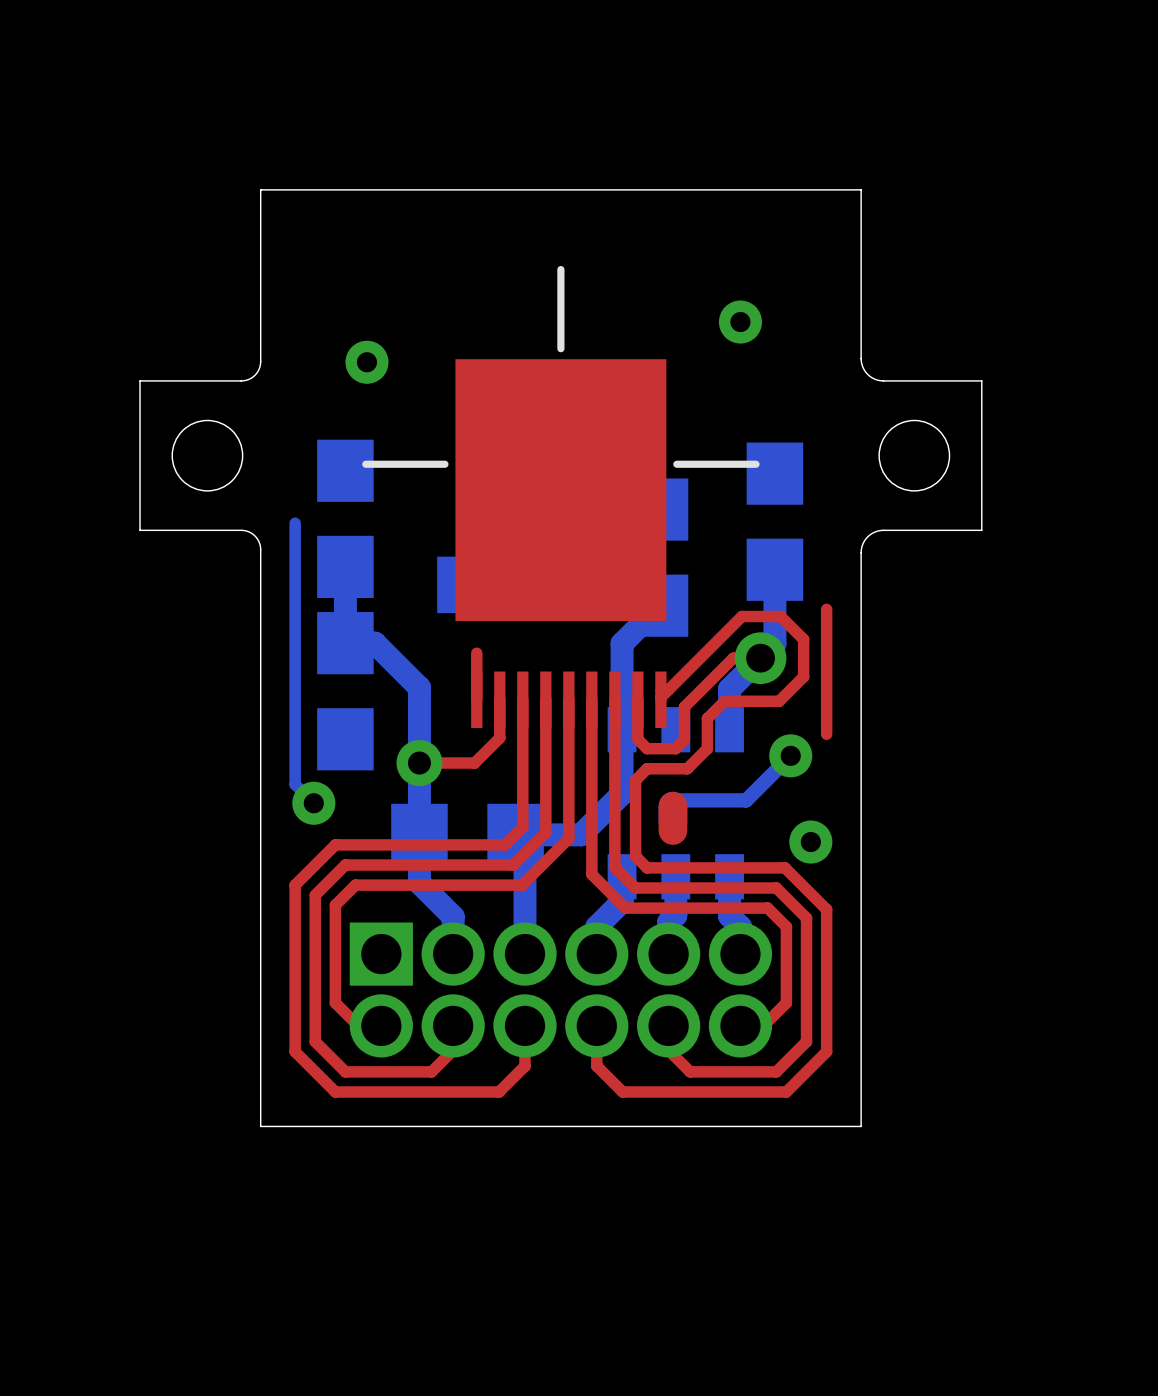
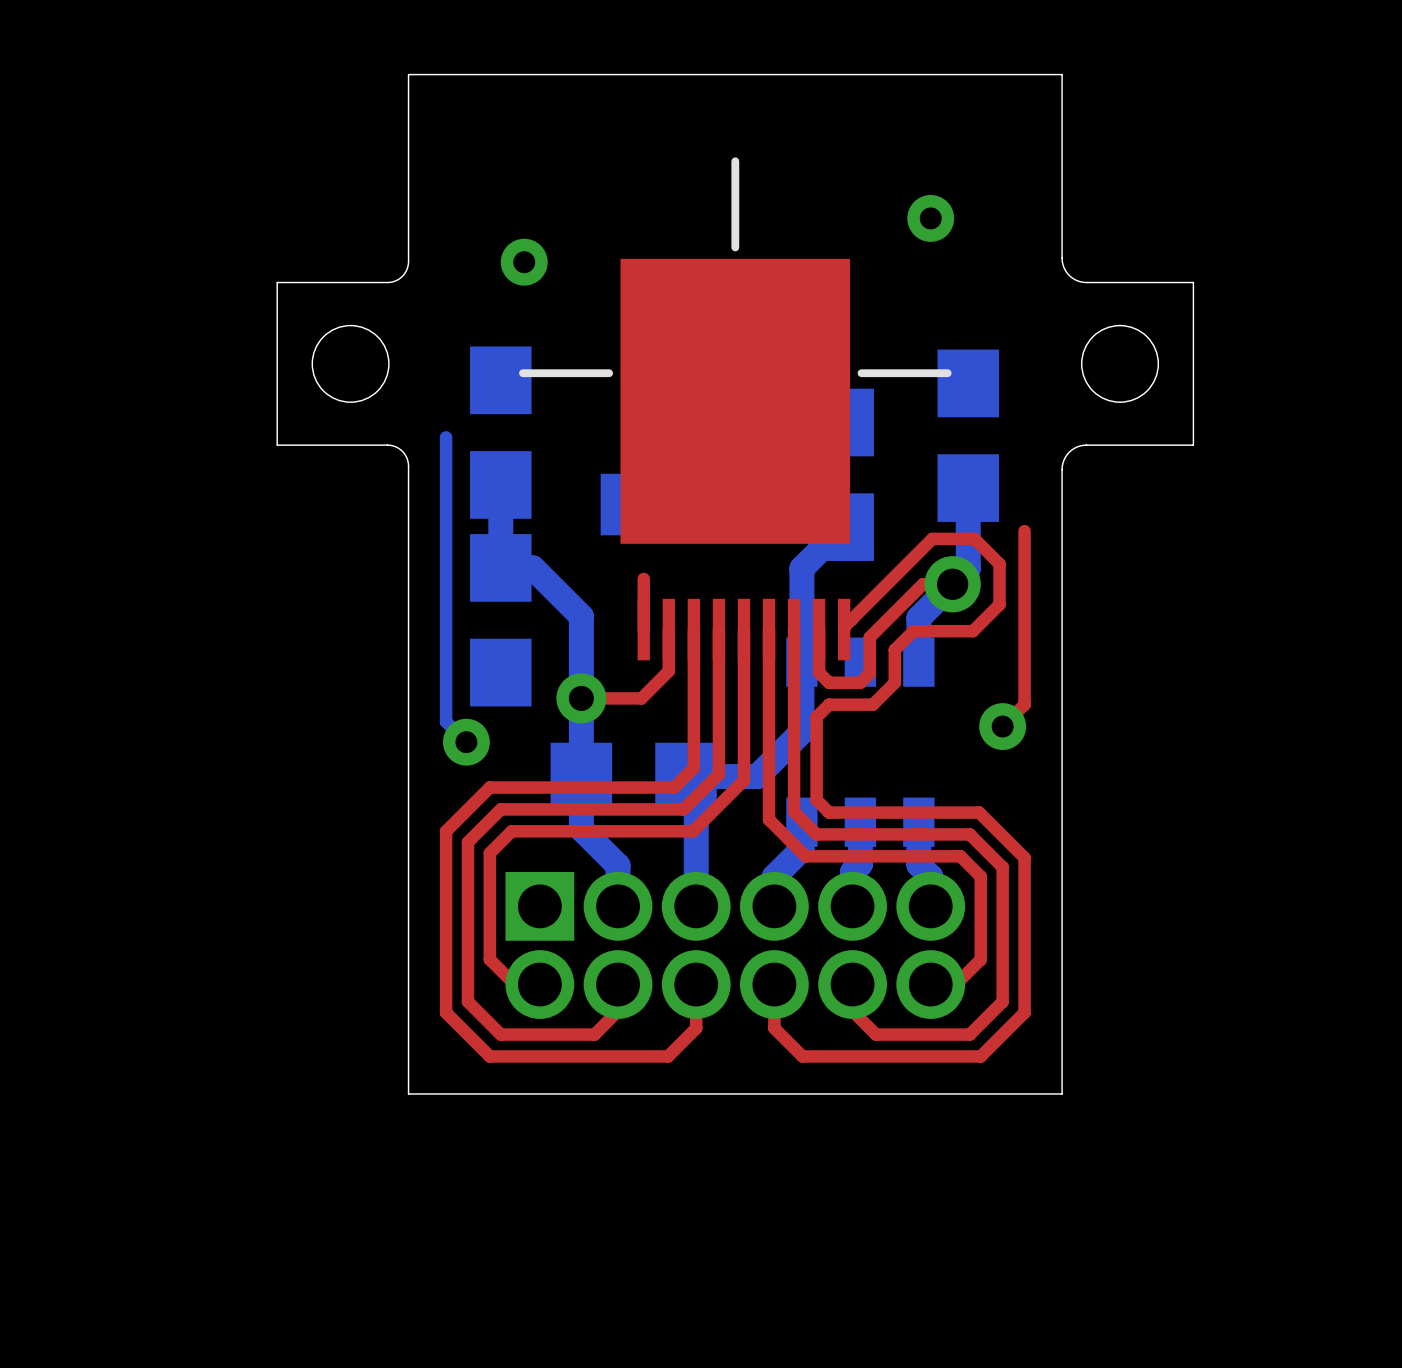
top track: none -> (1024, 667) (1024, 704) (1002, 726)
bottom track: (790, 755) (746, 800) (672, 800) (672, 821) -> none
via position: (790, 755) -> (1002, 726)
top track: (672, 806) (672, 830) -> none
via: (810, 842) -> none

